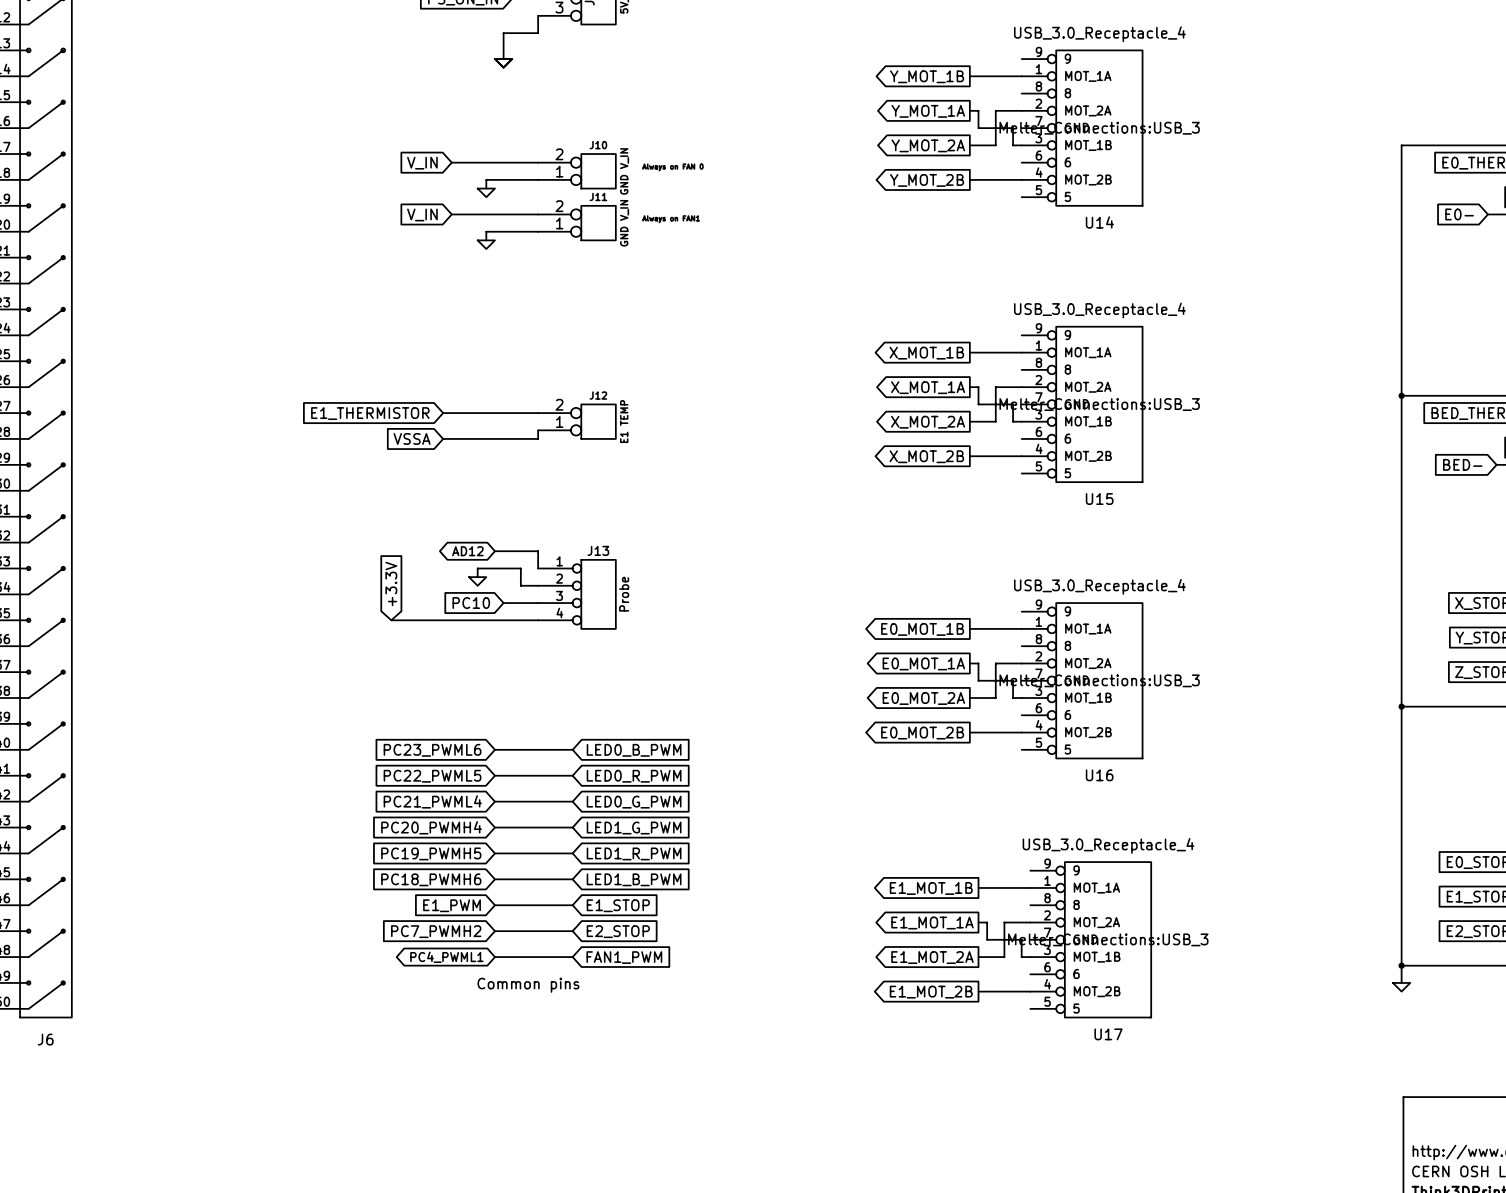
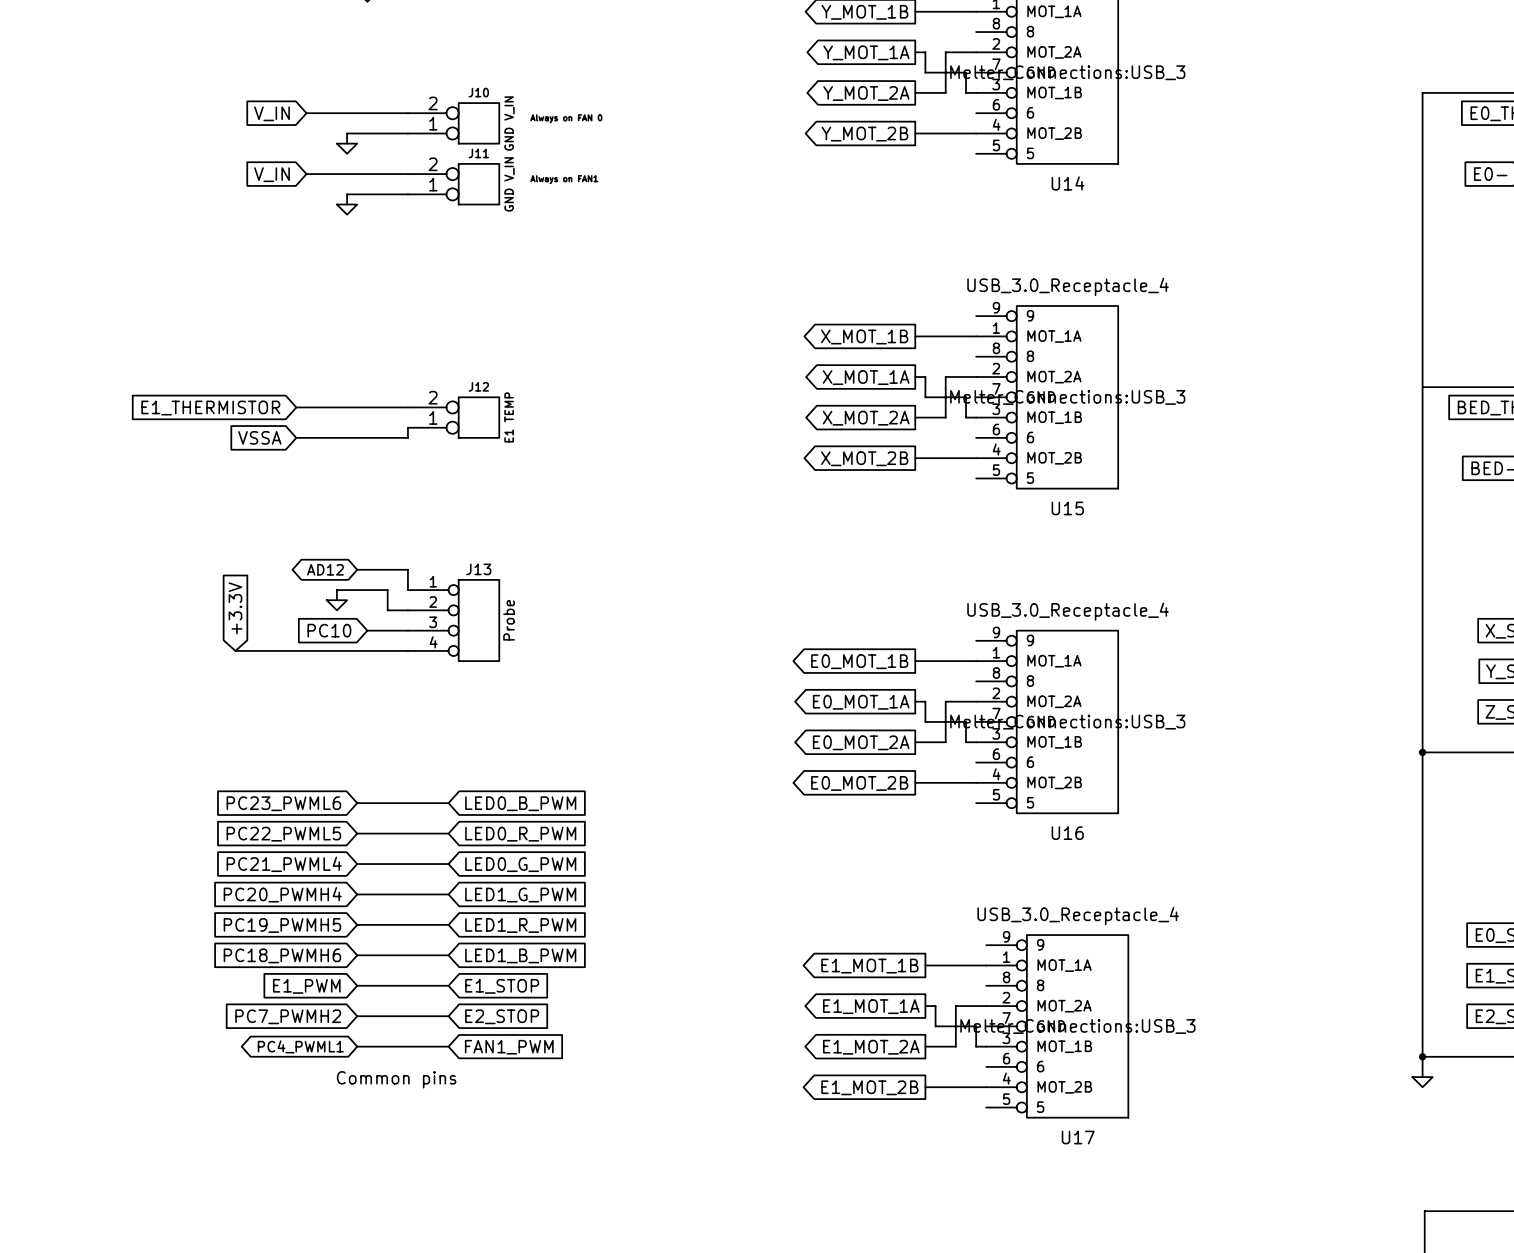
junction: (1401, 395) -> none

